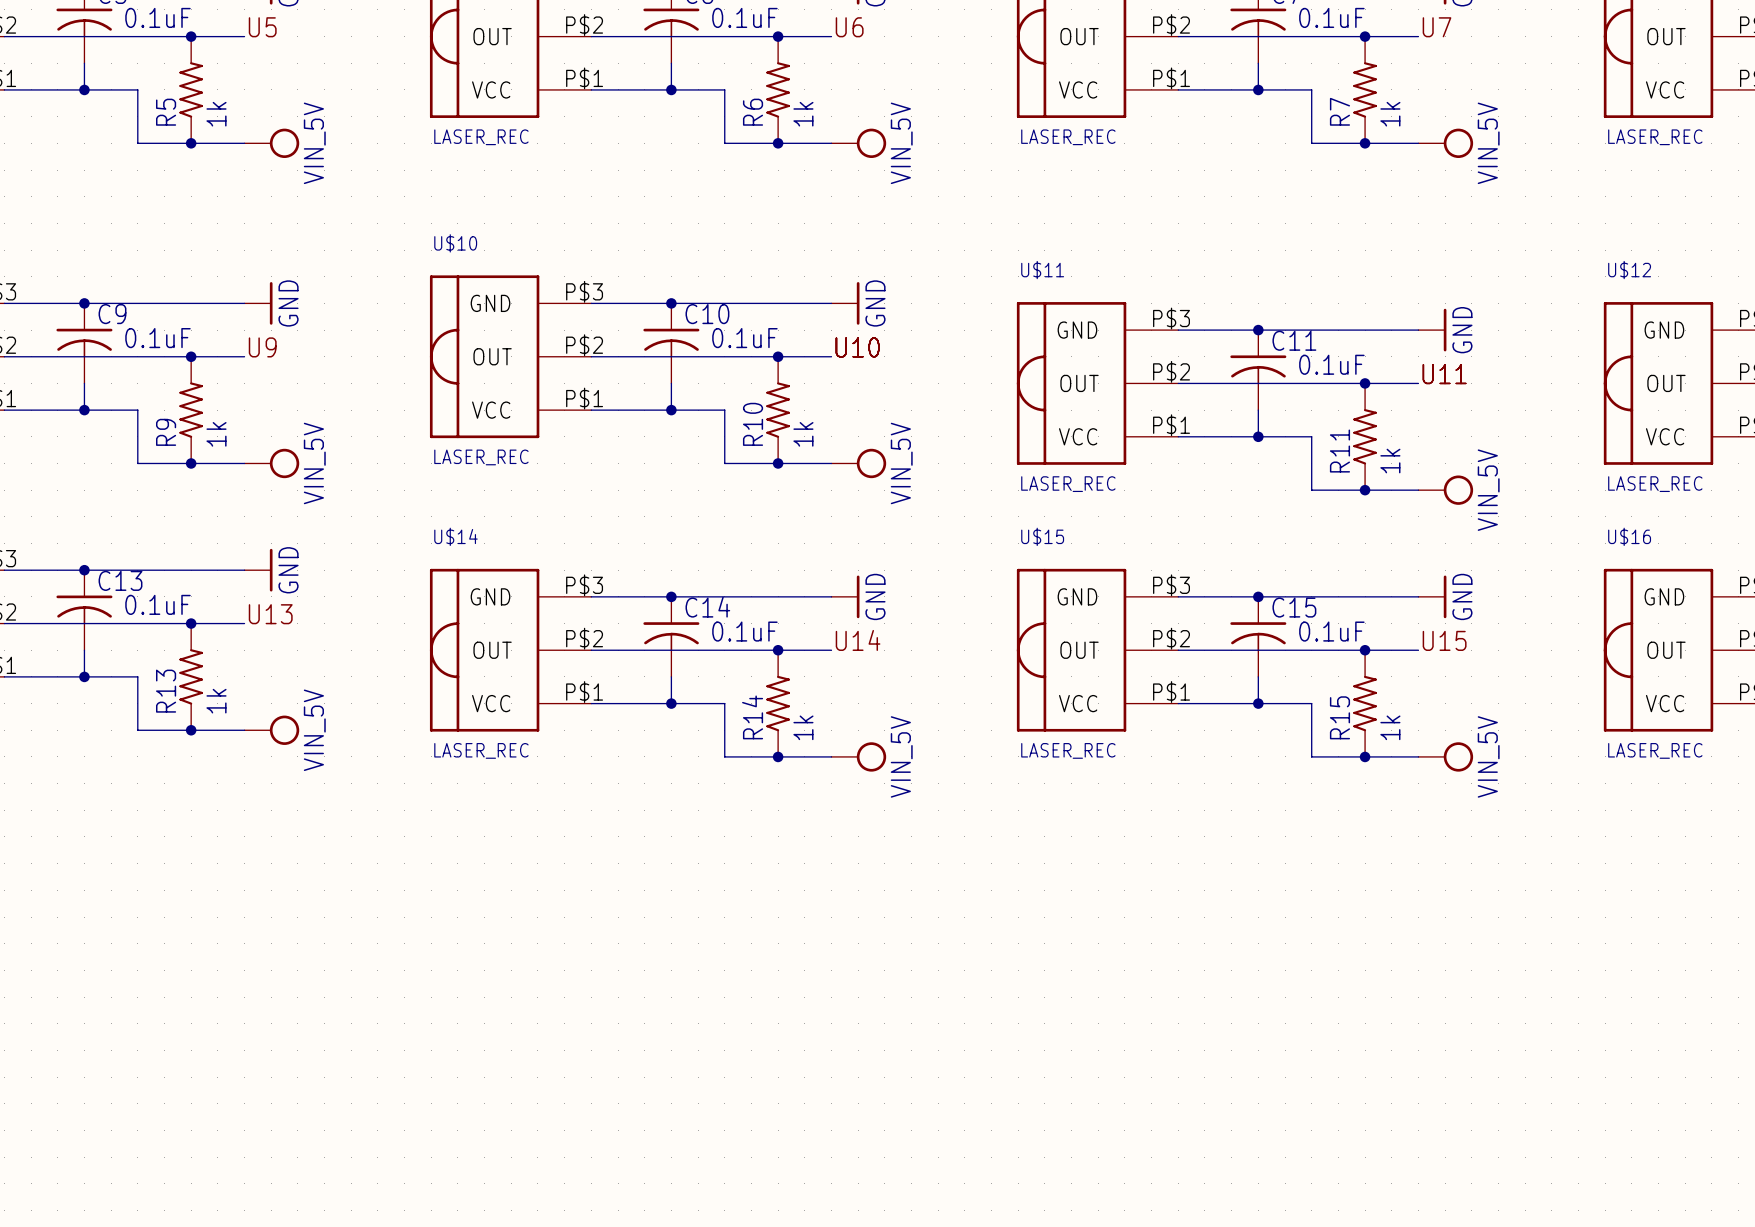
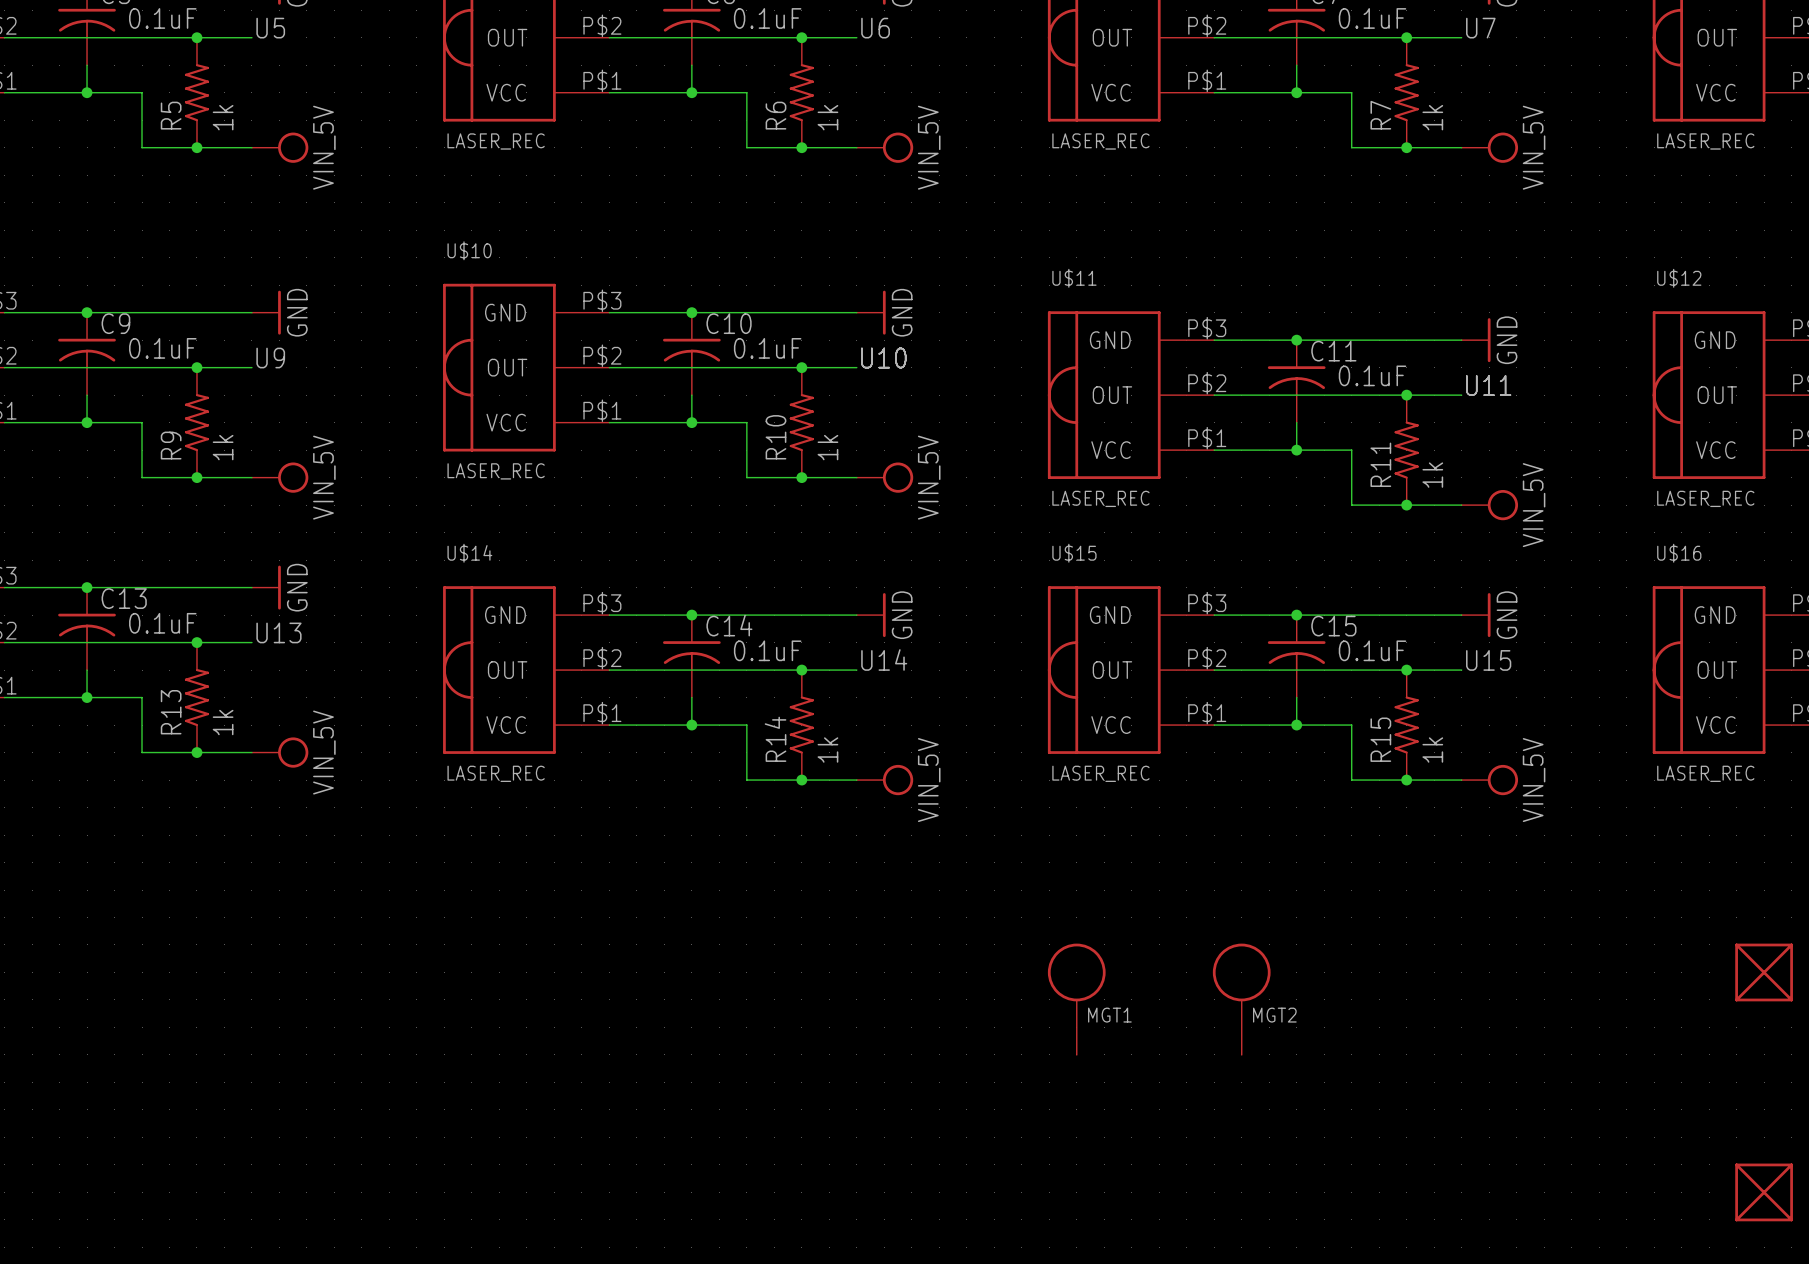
part: none -> (1764, 972)
MGT1: none -> (1076, 999)
MGT2: none -> (1241, 999)
part: none -> (1764, 1192)

